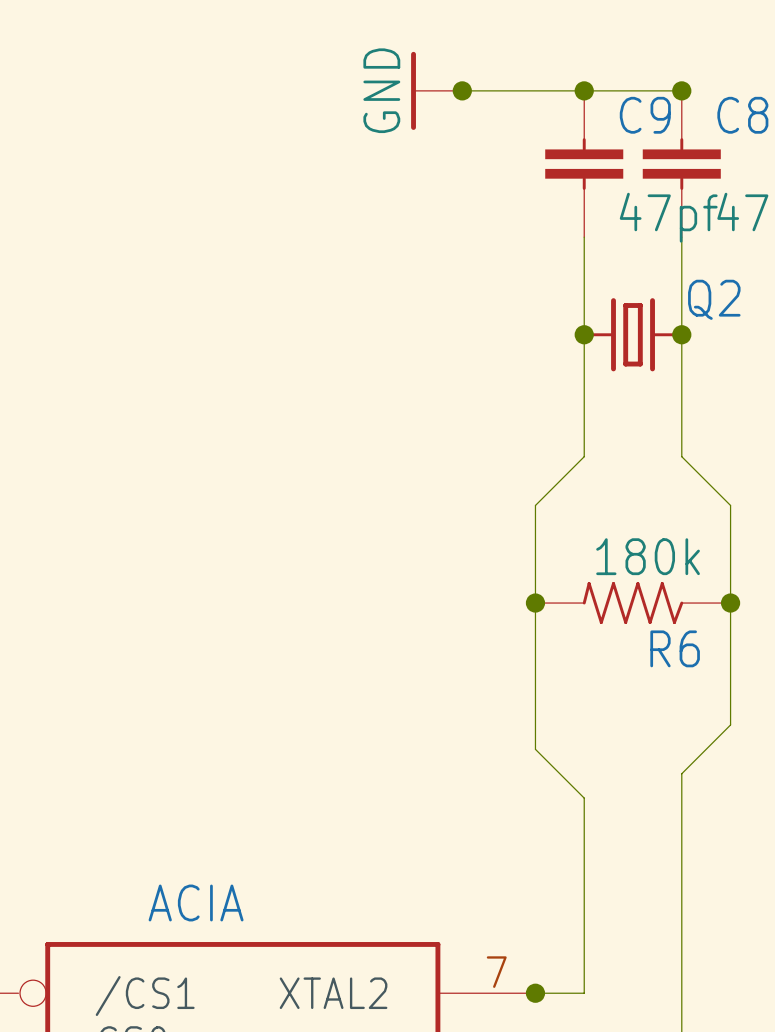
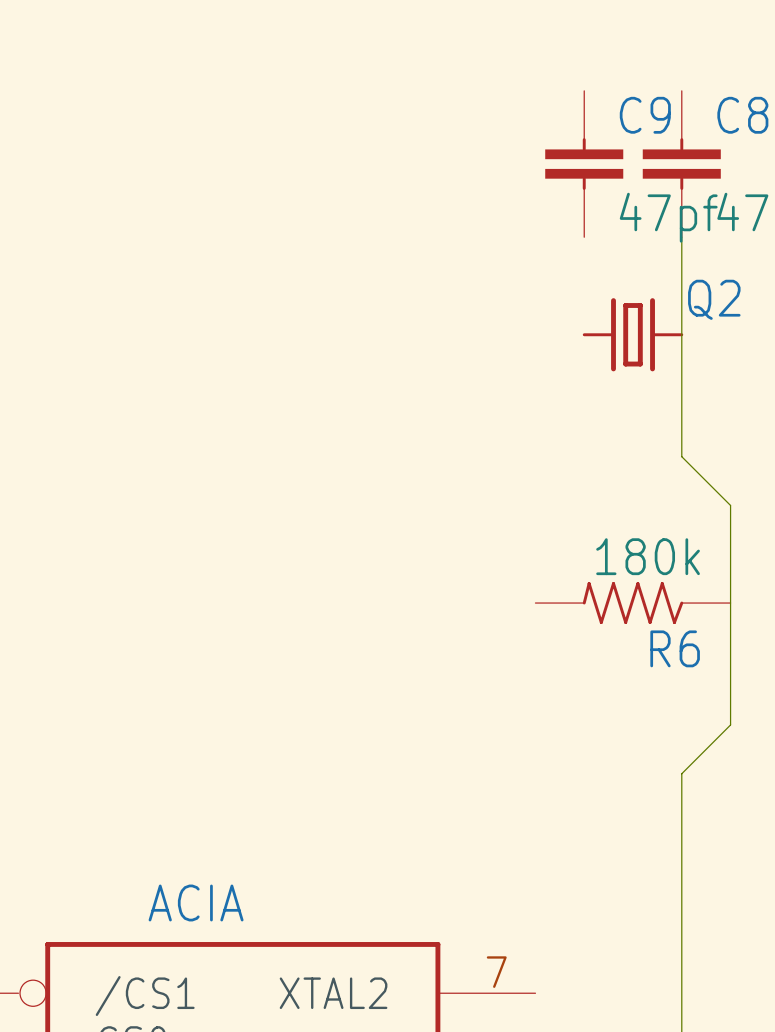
power symbol: GND (436, 90) -> none
wire: (462, 90) (681, 90) -> none
junction: (462, 90) -> none
junction: (584, 90) -> none
junction: (681, 90) -> none
wire: (584, 237) (584, 456) (535, 505) (535, 749) (584, 798) (584, 993) (535, 993) -> none
junction: (584, 334) -> none
junction: (681, 334) -> none
junction: (535, 603) -> none
junction: (730, 603) -> none
junction: (535, 993) -> none

